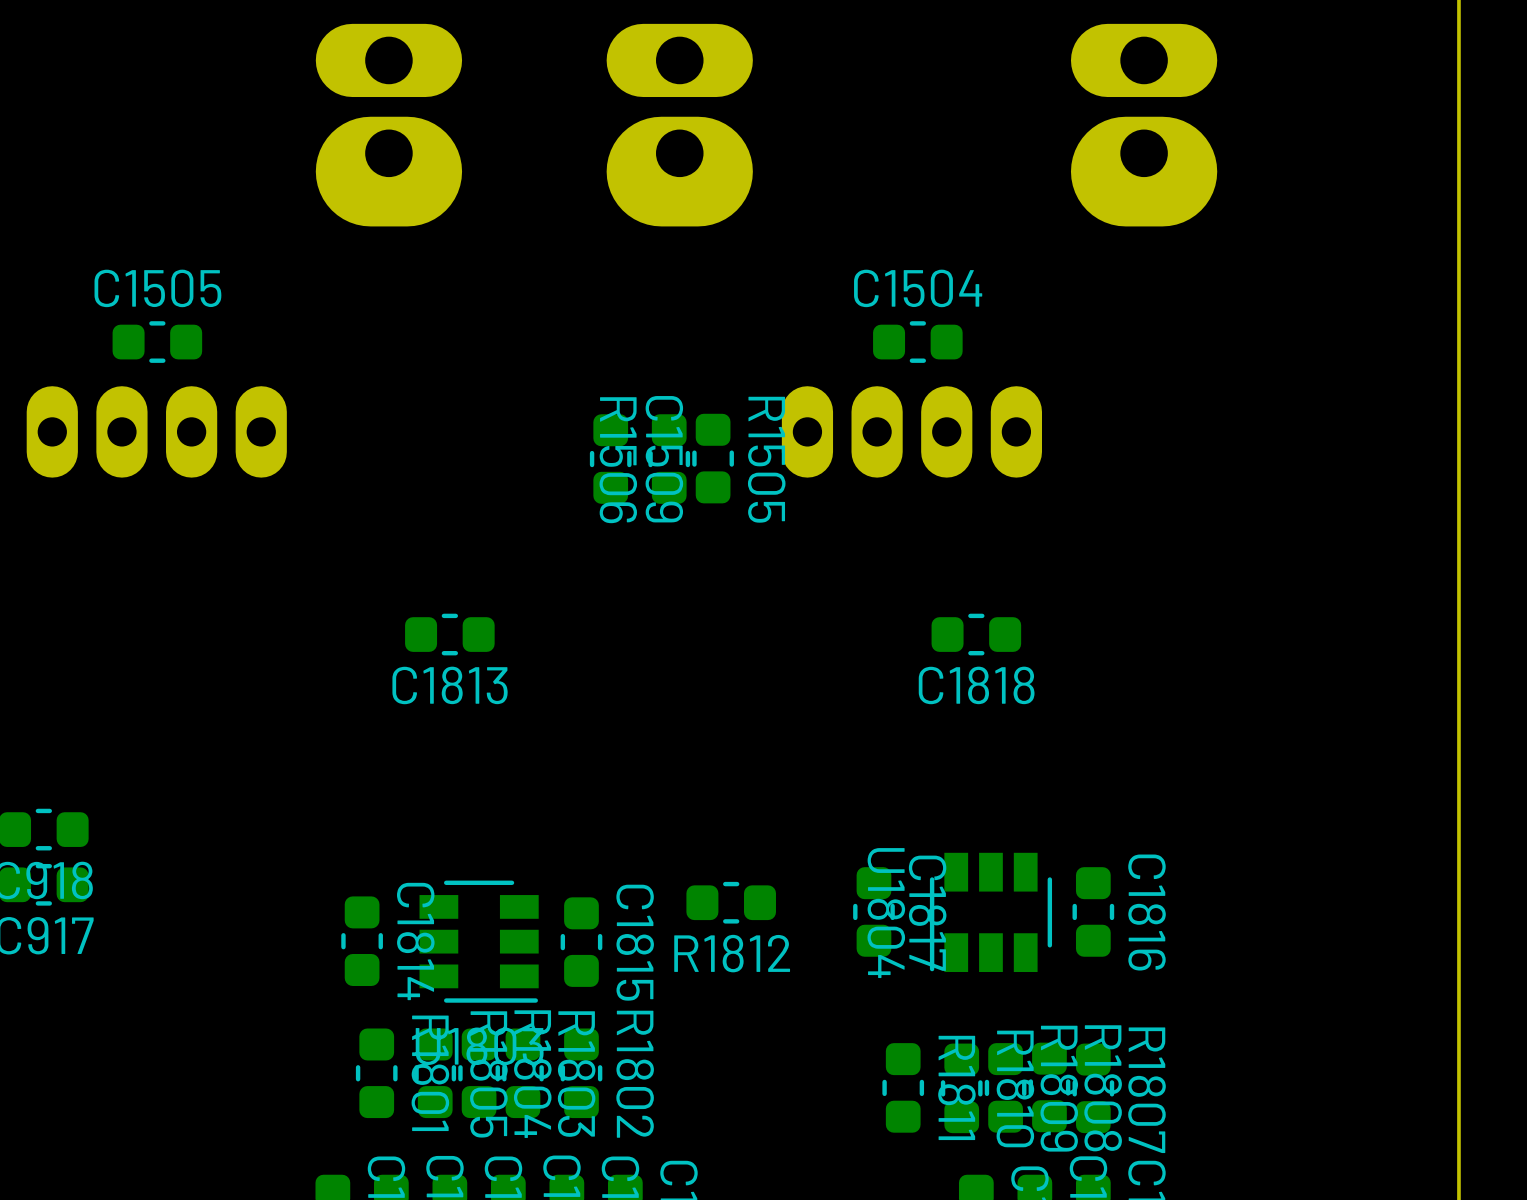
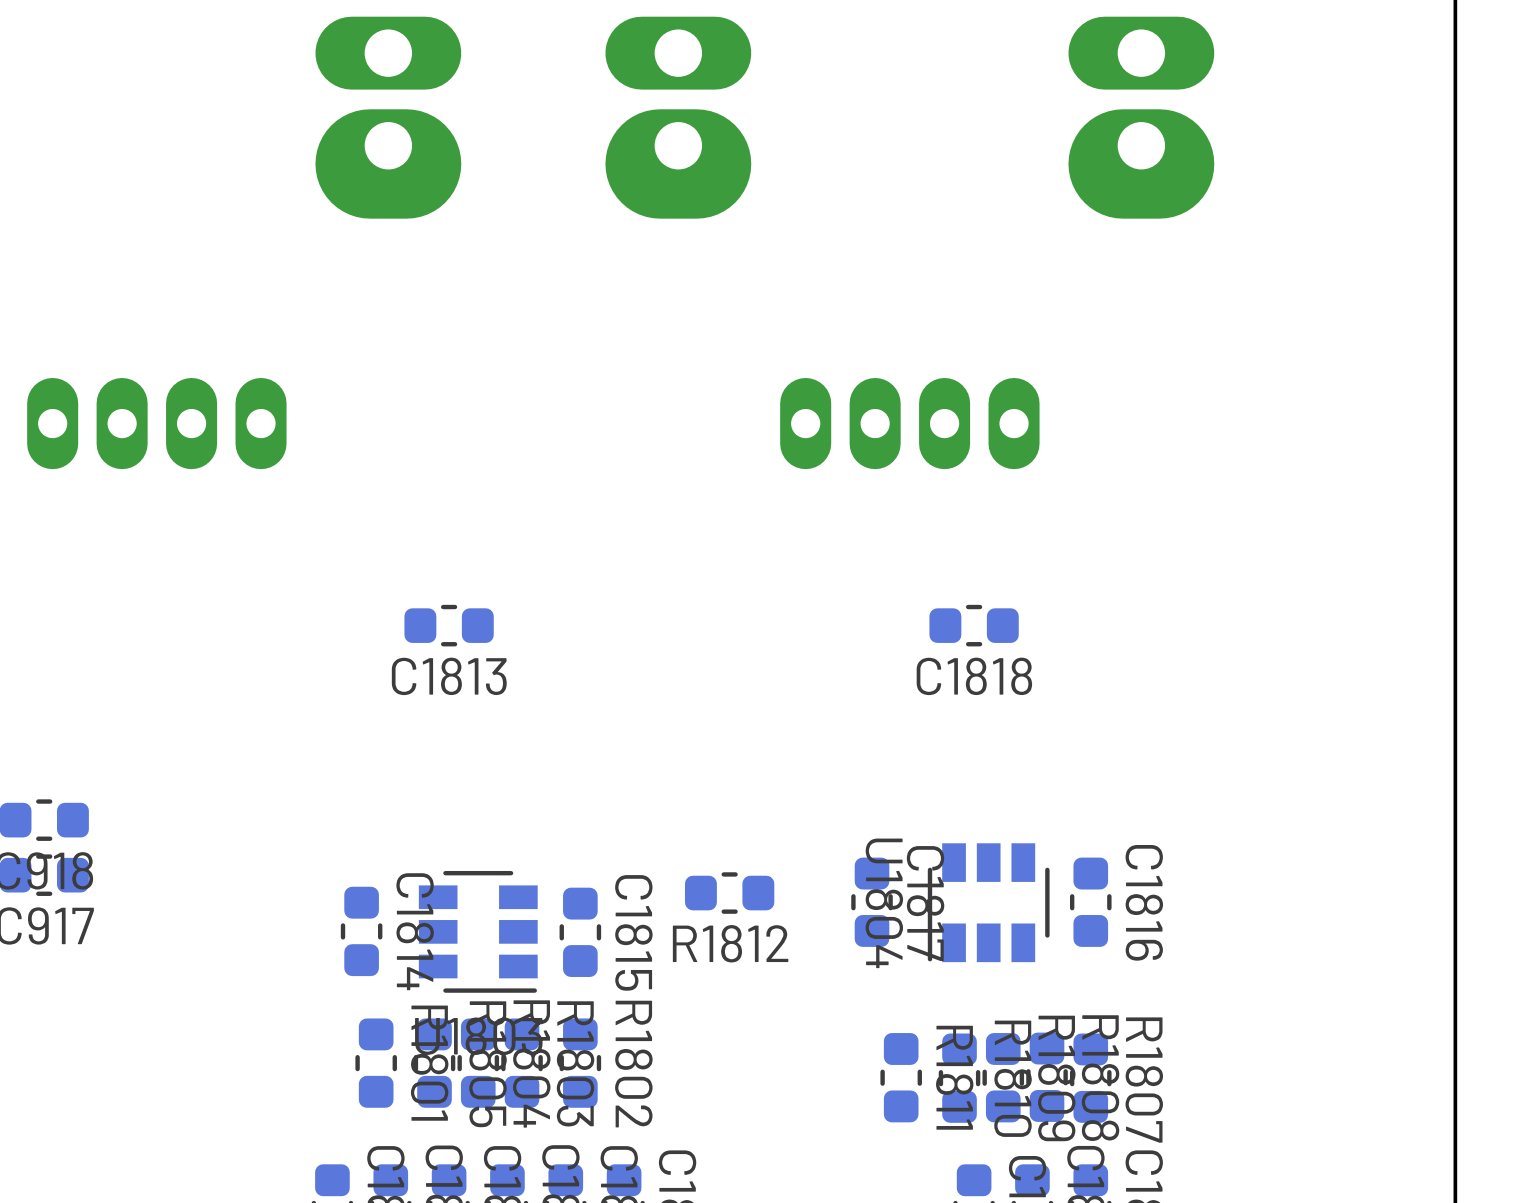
C1505: (157, 342) -> none
C1504: (917, 342) -> none
R1505: (713, 458) -> none
C1509: (610, 459) -> none
R1506: (669, 459) -> none

